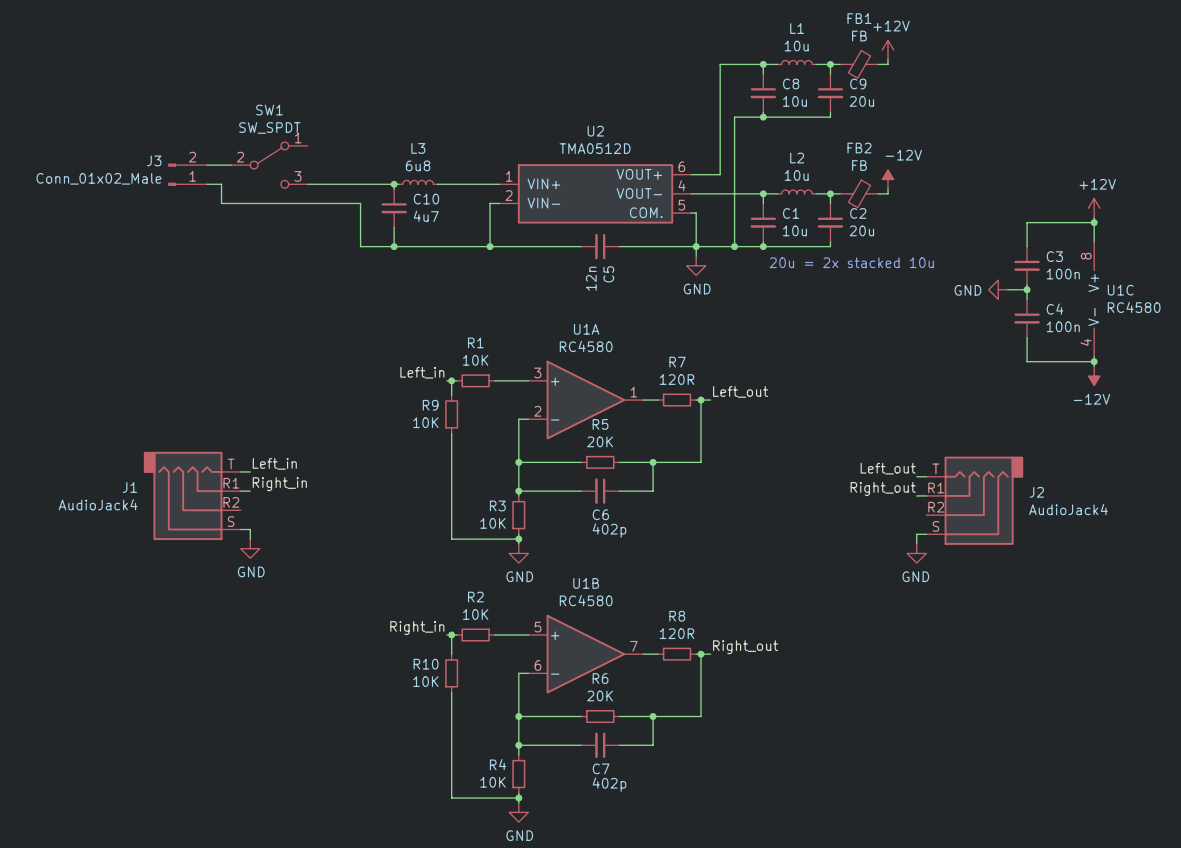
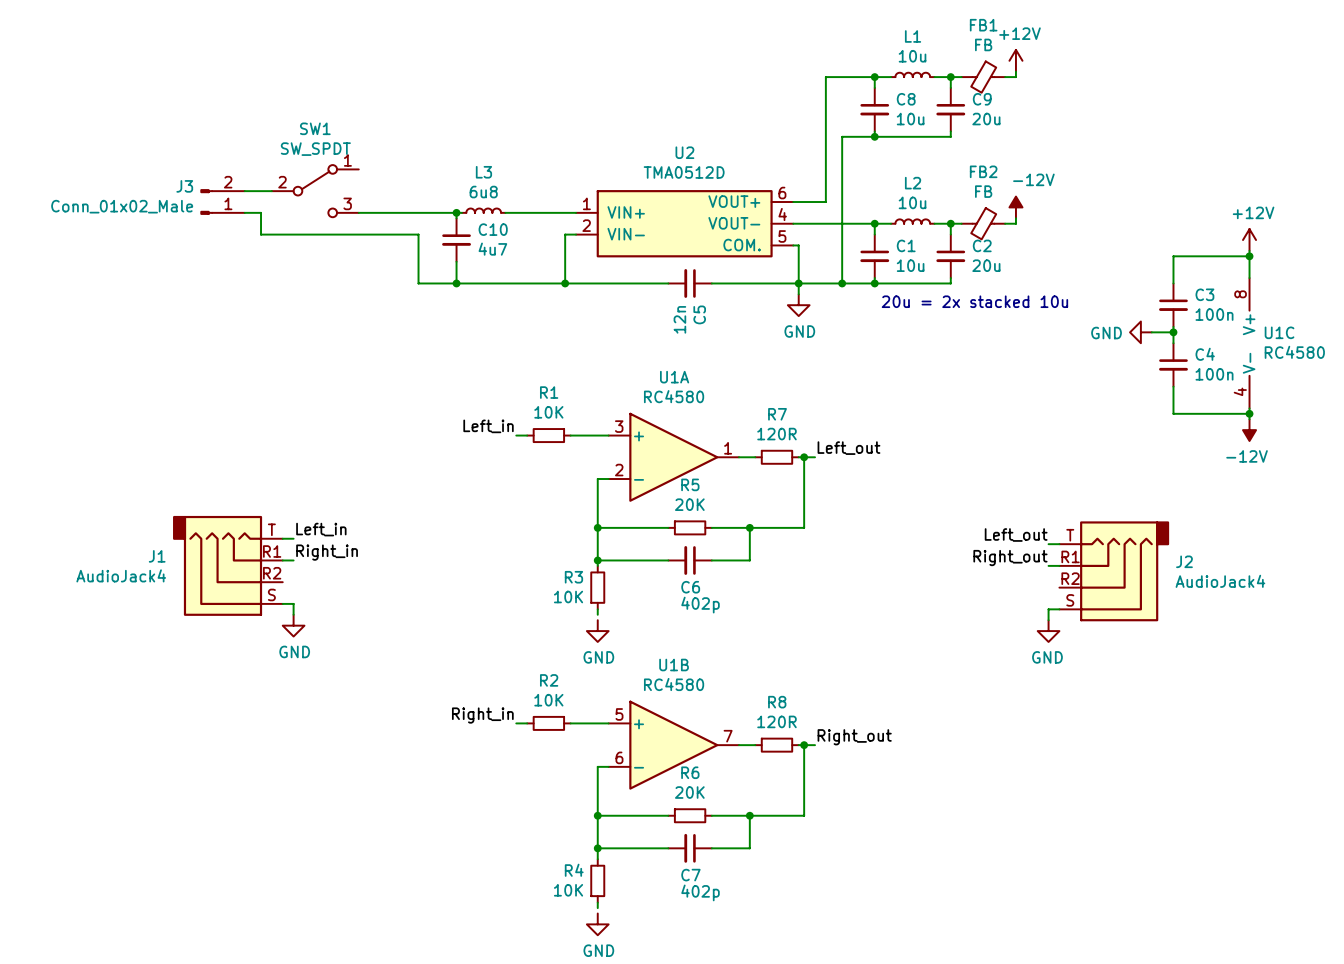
wire: (451, 380) (451, 395) -> none
junction: (451, 380) -> none
R9: 10K (451, 414) -> none
wire: (451, 433) (451, 539) (518, 539) (518, 543) -> none
junction: (518, 539) -> none
wire: (451, 634) (451, 654) -> none
junction: (451, 634) -> none
R10: 10K (451, 673) -> none
wire: (451, 692) (451, 798) (518, 798) (518, 802) -> none
junction: (518, 798) -> none

